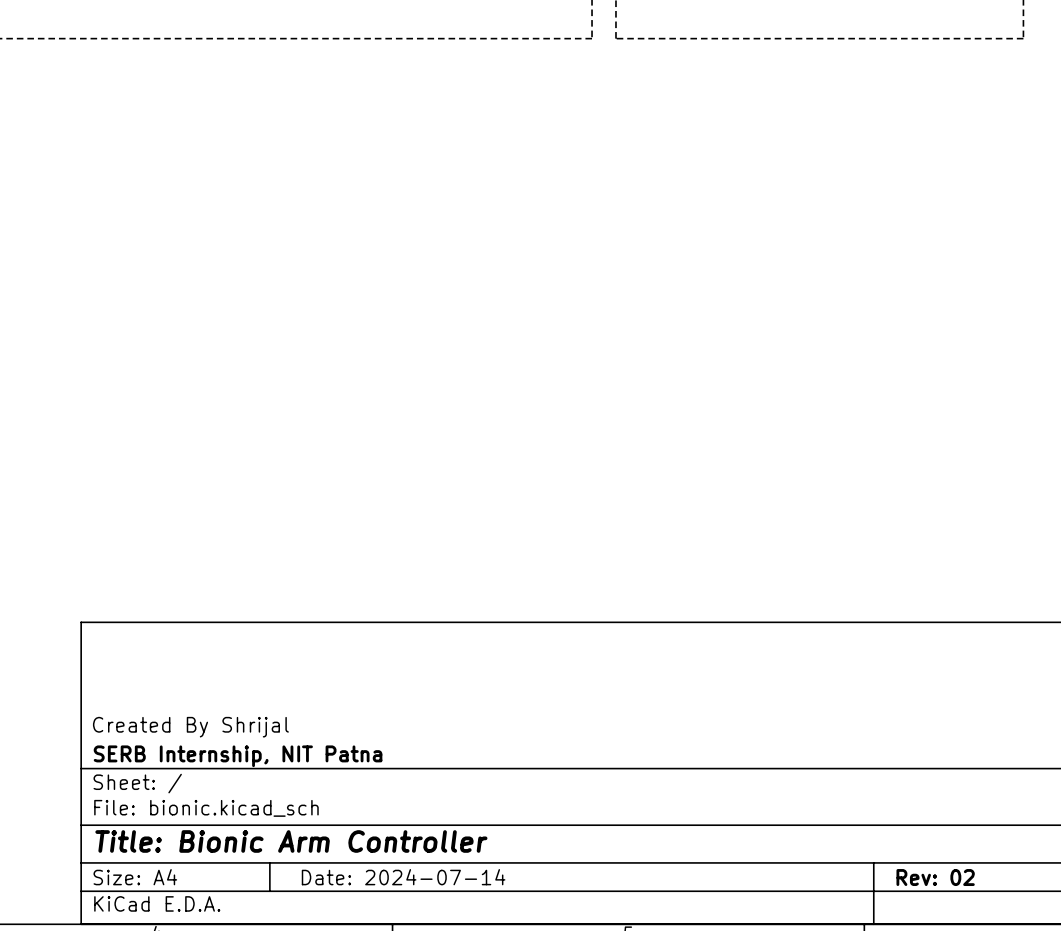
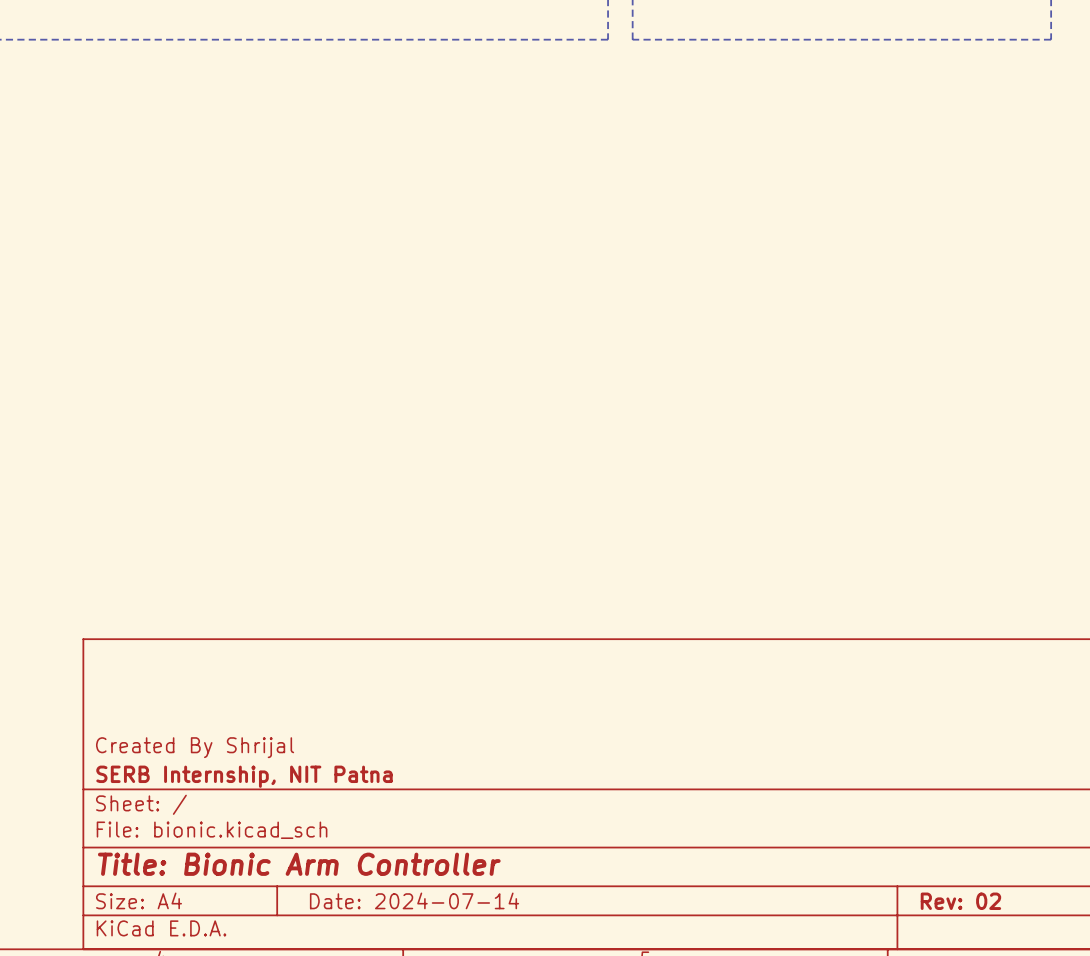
title block: none -> Created By Shrijal (195, 747)
text: Created By Shrijal (190, 727) -> none

